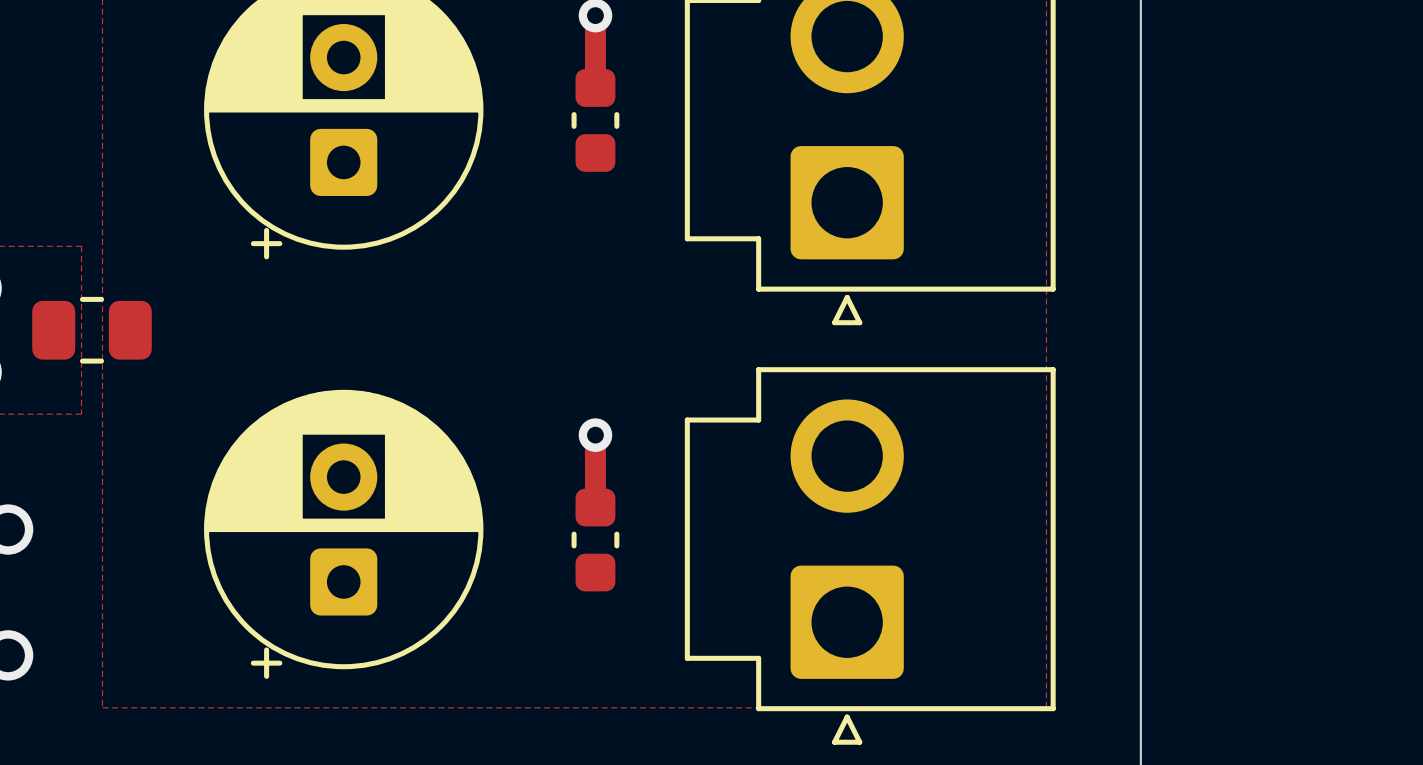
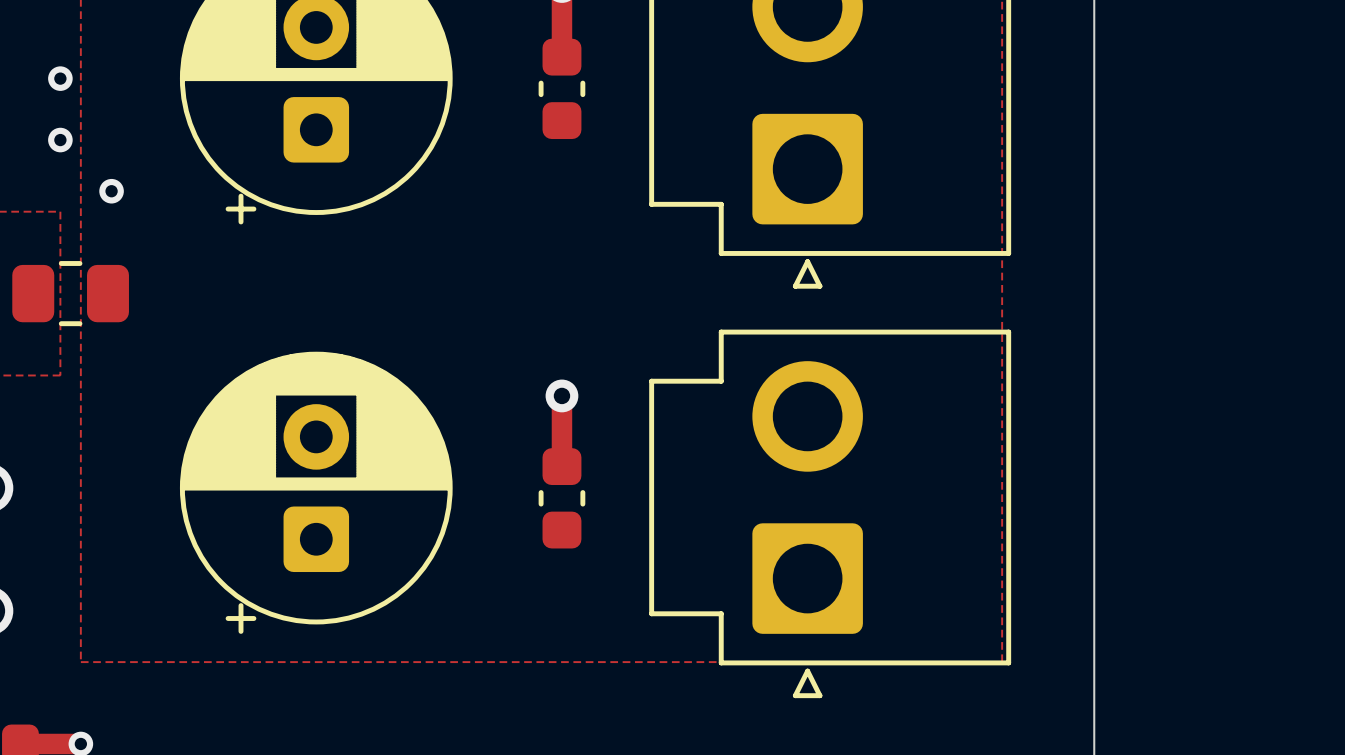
via: none -> (60, 78)
via: none -> (60, 140)
via: none -> (111, 191)

